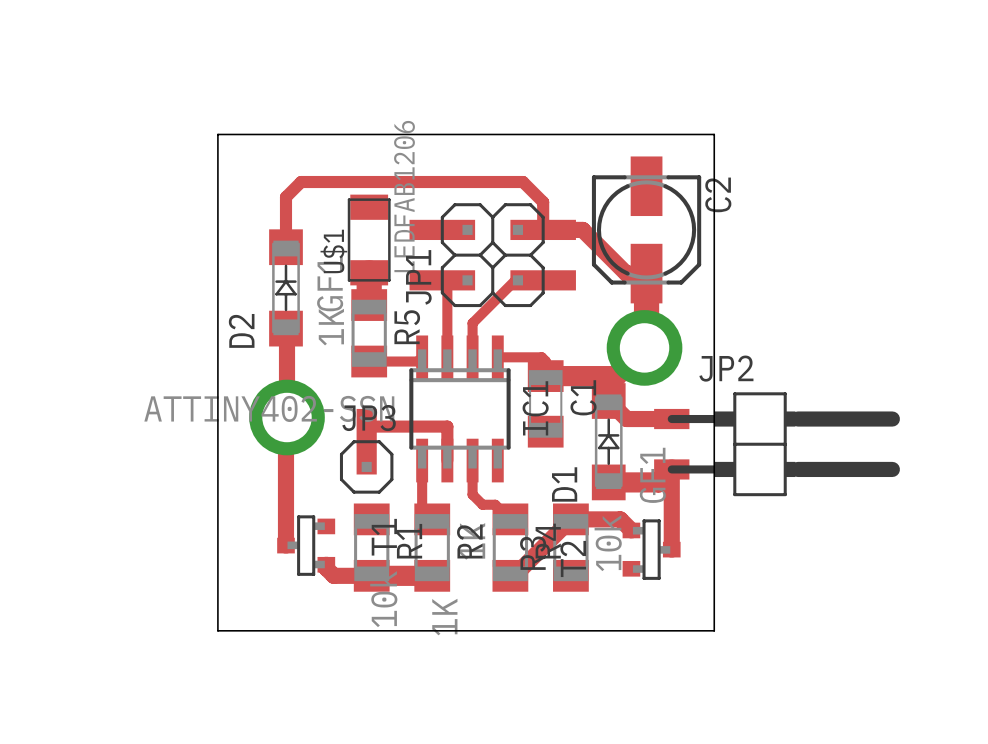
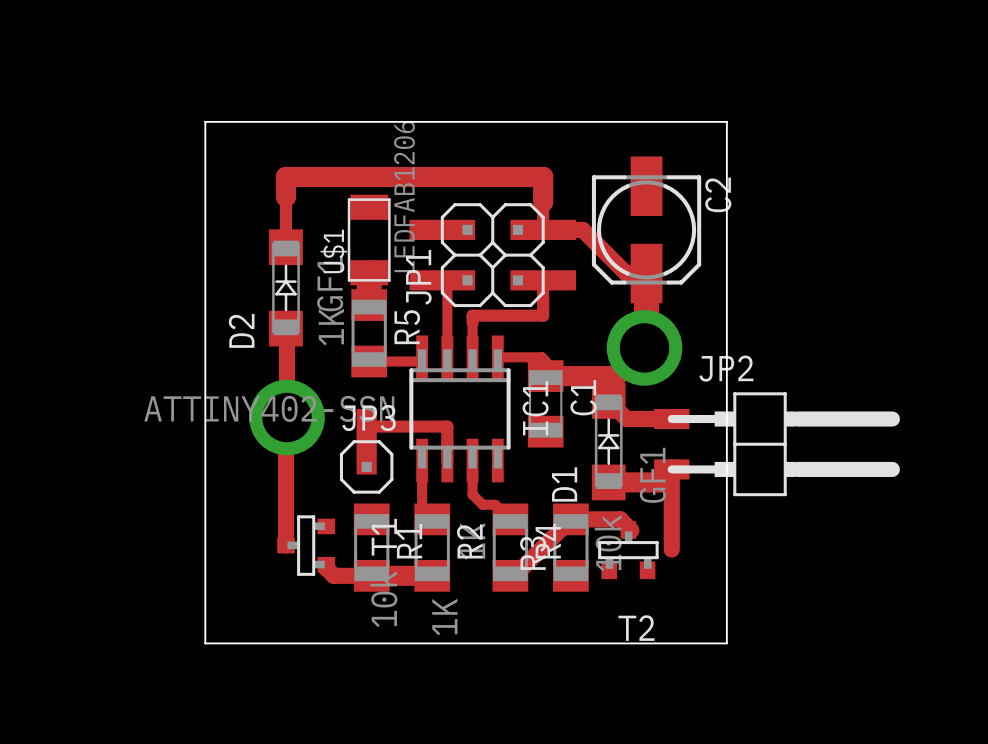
board edge: (217, 134) (714, 134) (714, 630) (217, 630) (217, 134) -> (205, 121) (205, 643) (726, 643) (726, 121) (205, 121)
top track: (285, 197) (301, 182) (523, 182) (543, 202) -> (285, 197) (285, 176) (543, 176) (543, 202)
top track: (515, 280) (472, 323) -> (543, 280) (543, 315) (472, 315) (472, 323)
T2 rotation: 0° (651, 549) -> 90° counterclockwise (628, 550)

